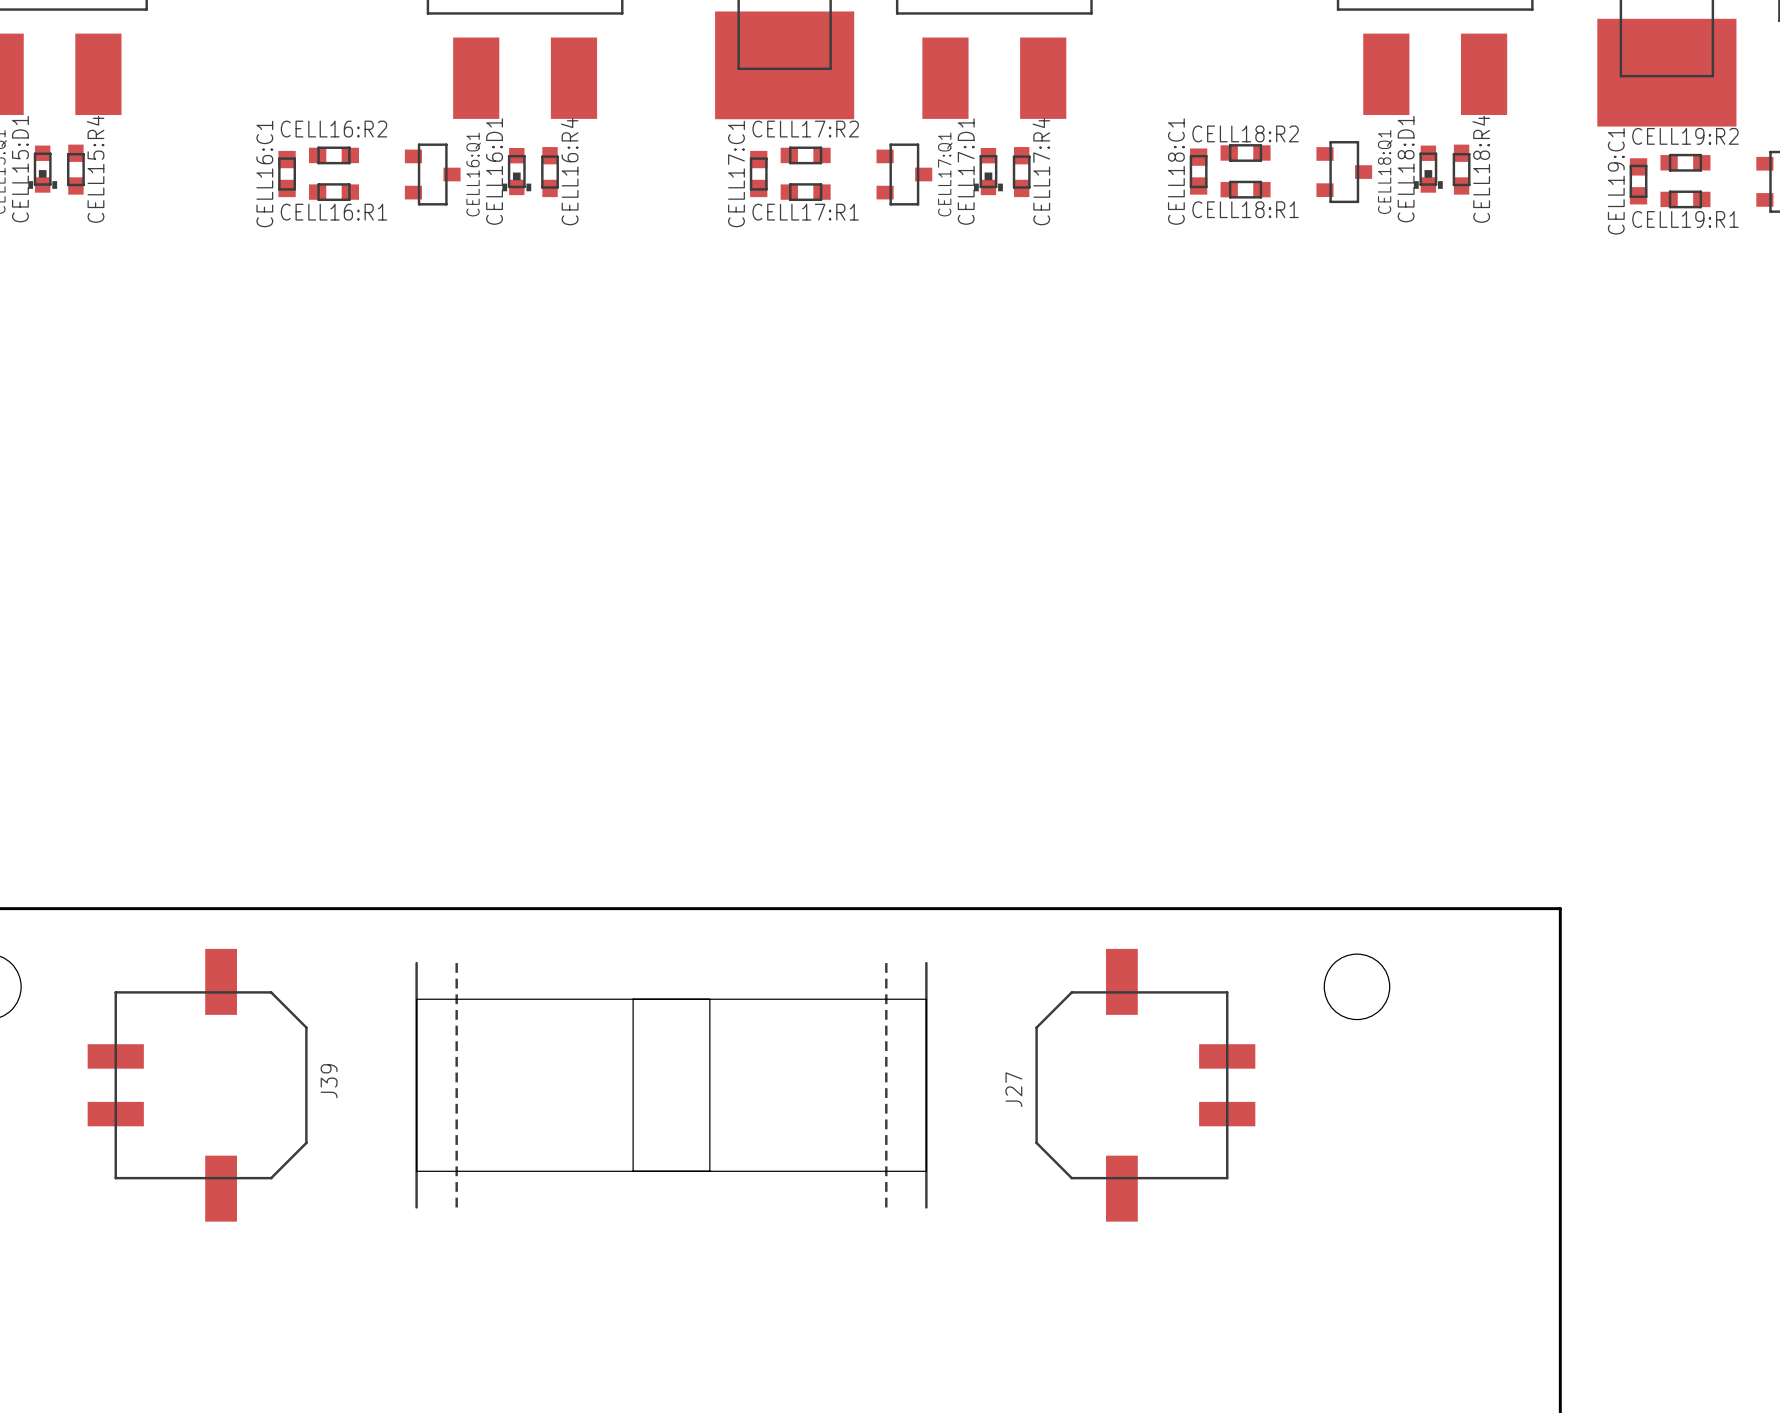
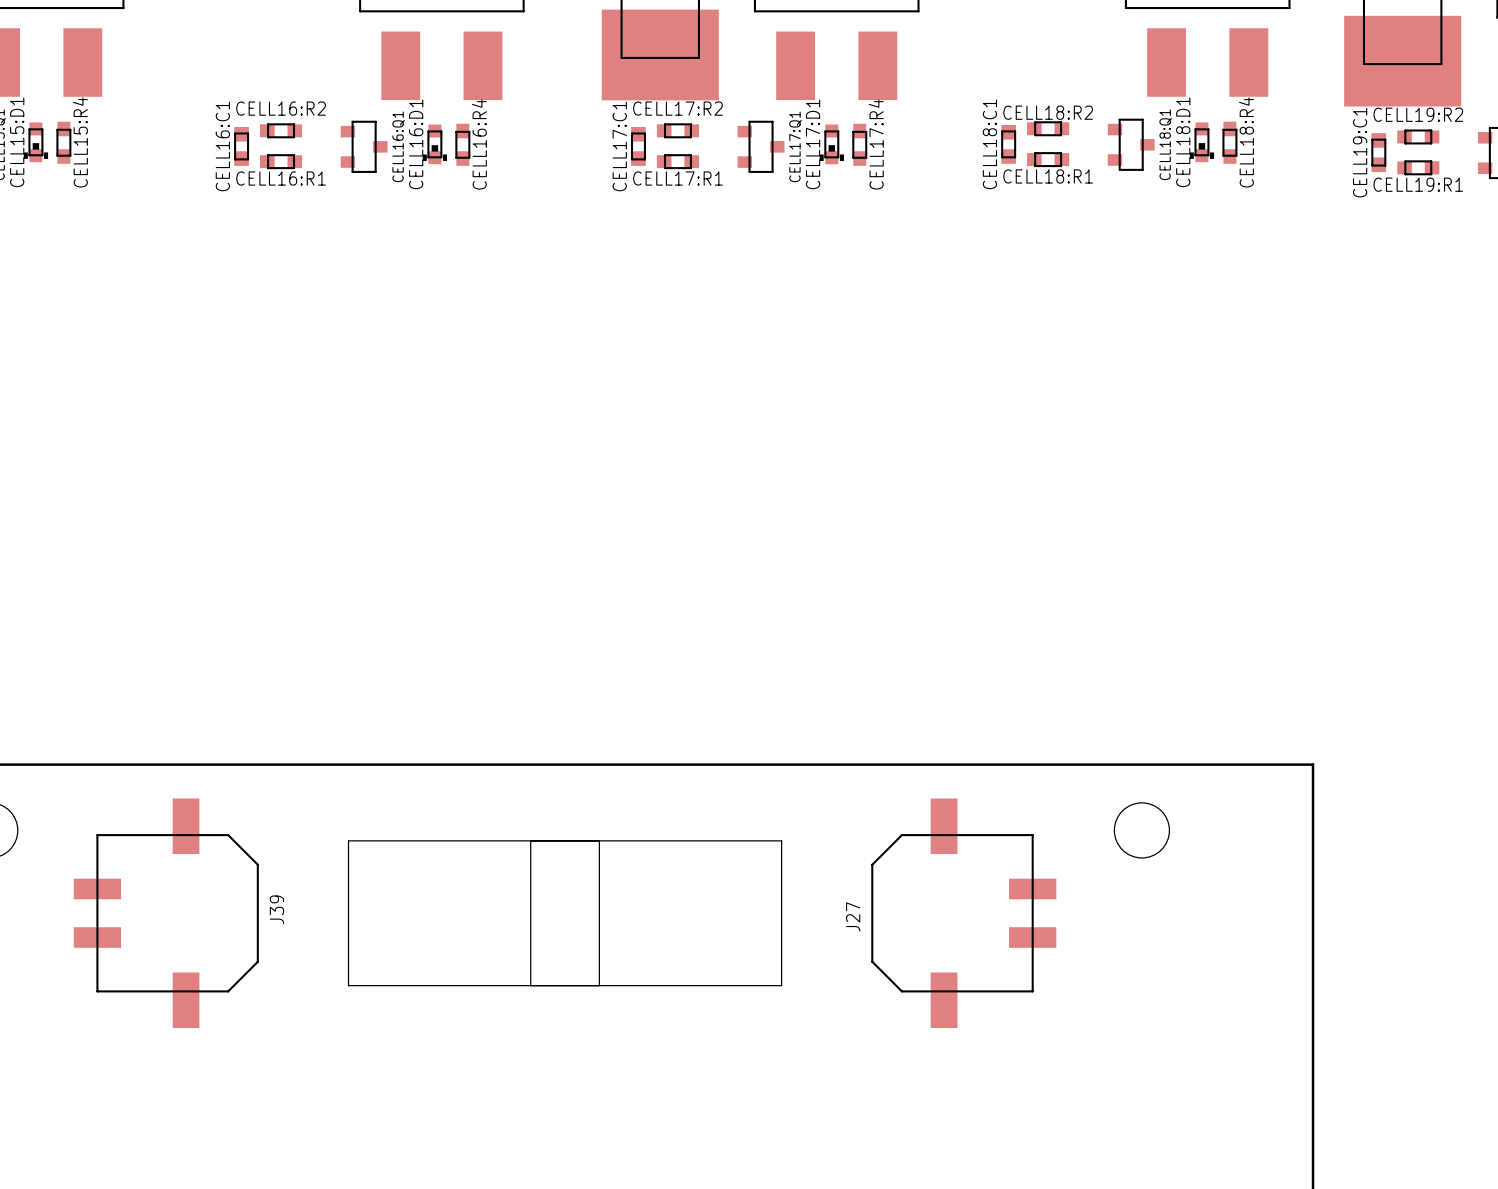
J39 footprint: [87, 948, 710, 1222] -> [73, 798, 600, 1029]
J27 footprint: [633, 948, 1256, 1222] -> [530, 798, 1057, 1029]

